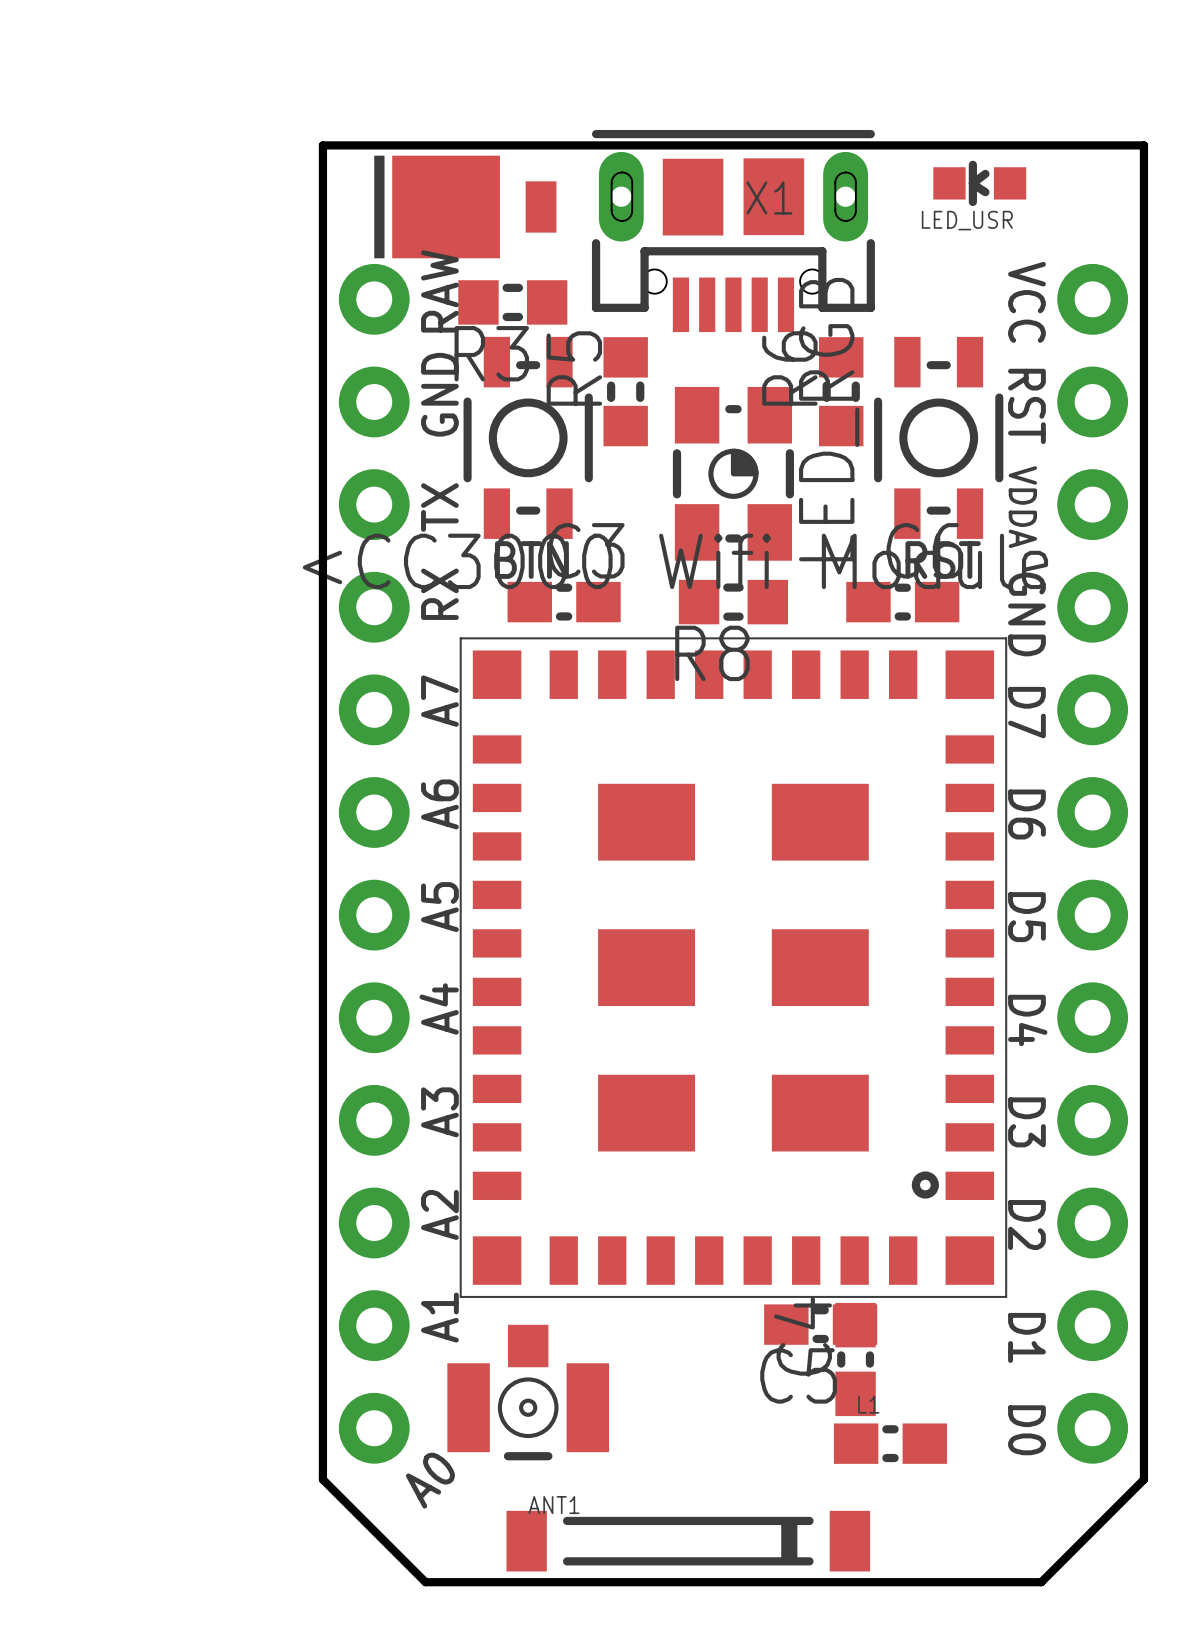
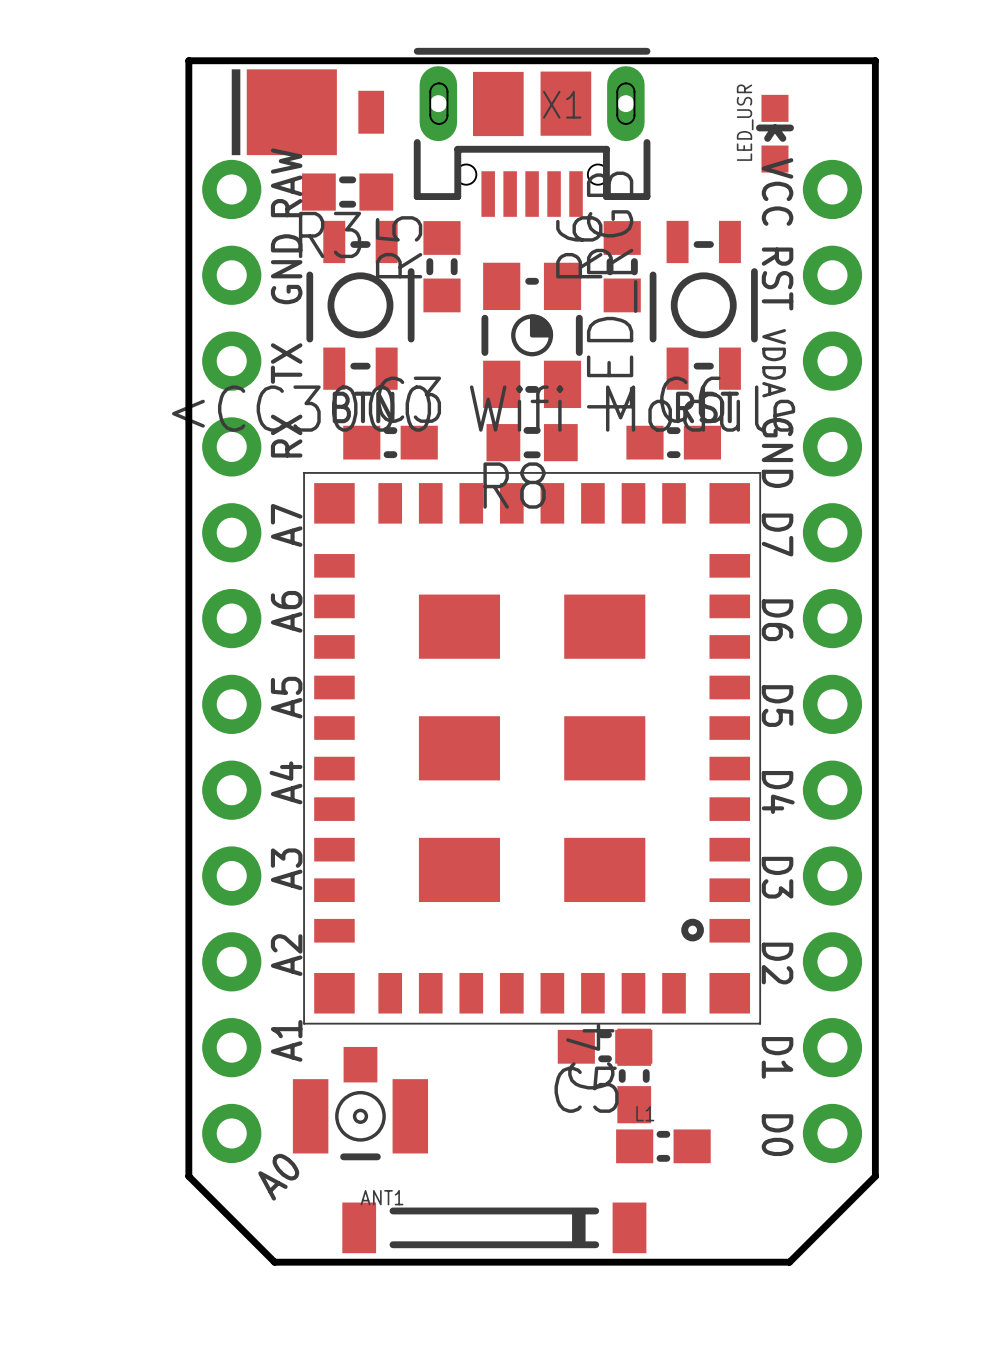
LED_USR rotation: 0° (979, 183) -> 90° clockwise (774, 133)
LED_USR position: (979, 183) -> (774, 133)

